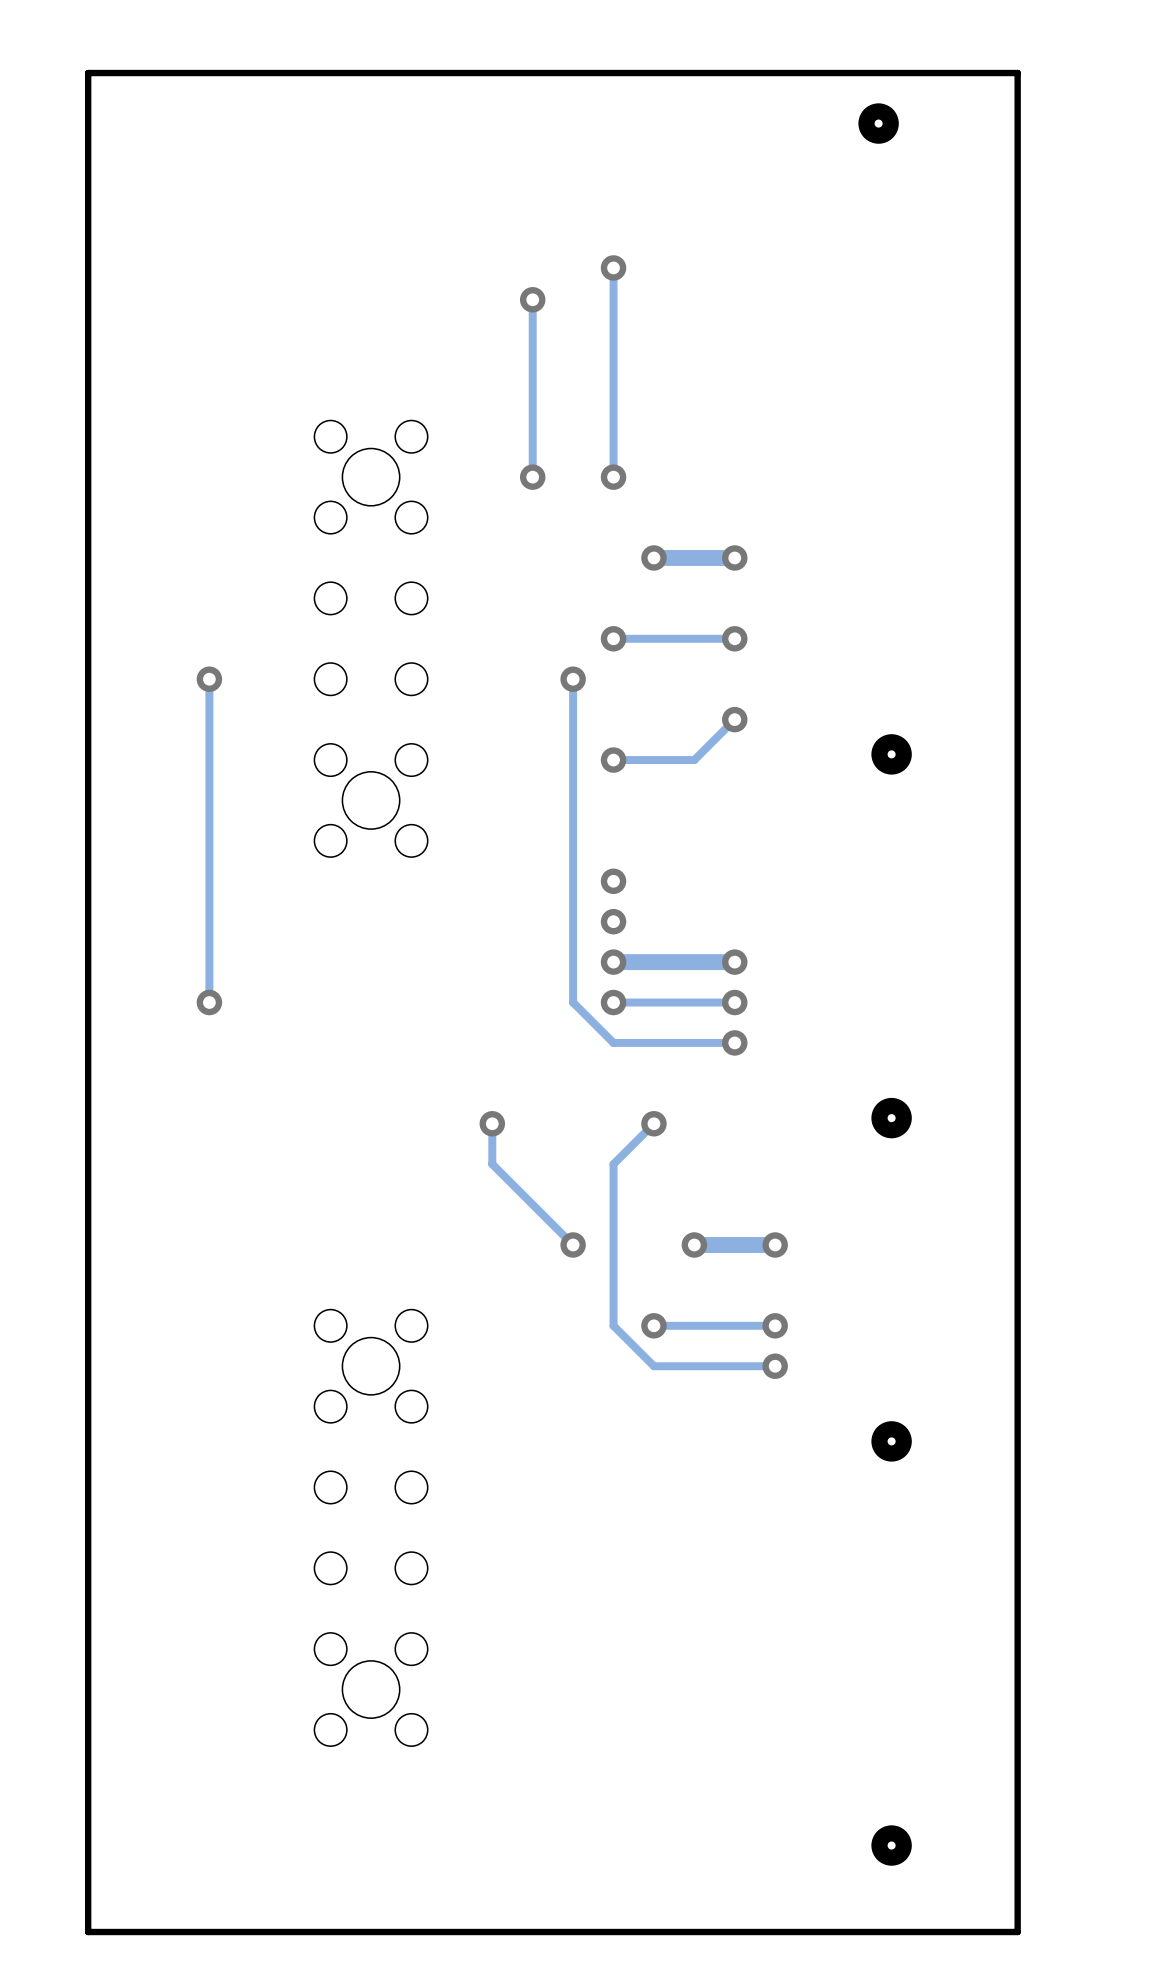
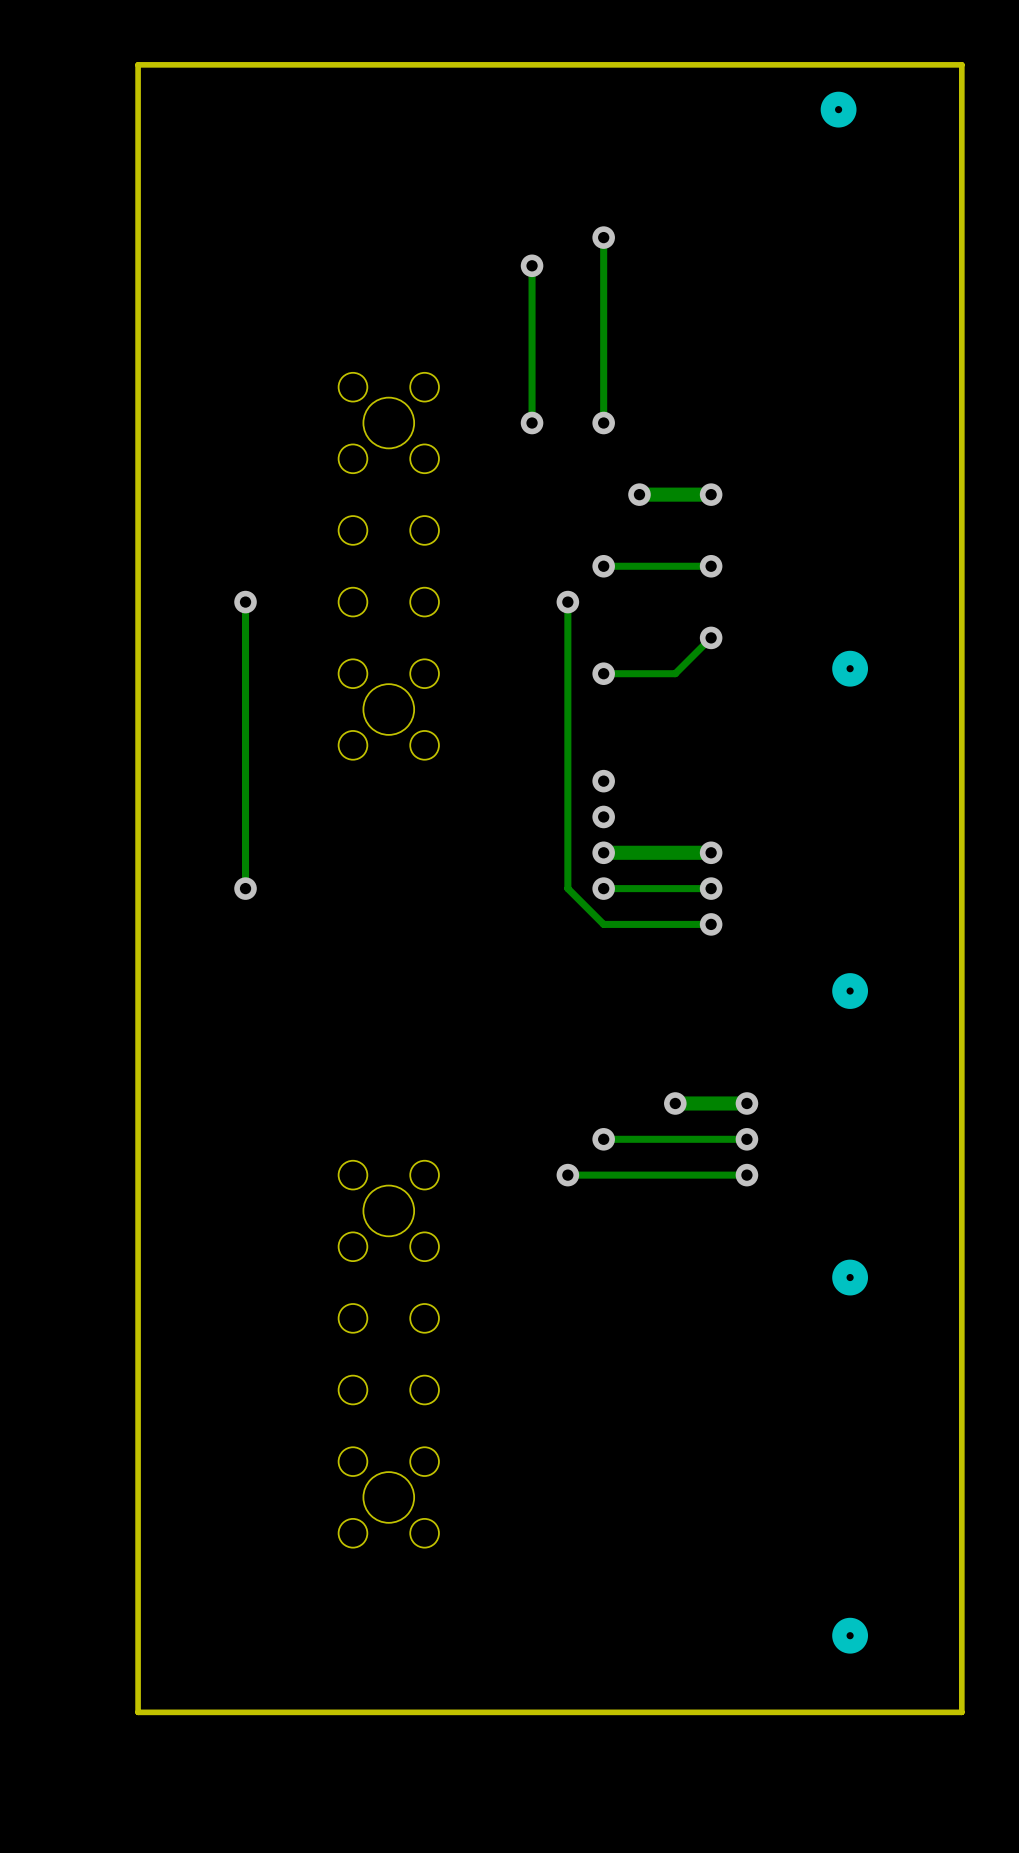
track: (492, 1123) (492, 1164) (573, 1244) -> none
via: (492, 1123) -> none
track: (653, 1123) (613, 1164) (613, 1325) (653, 1366) (775, 1366) -> none
via: (653, 1123) -> none
via: (573, 1244) -> none
via: none -> (603, 1139)
track: none -> (746, 1139) (603, 1139)
via: none -> (746, 1139)
via: none -> (567, 1175)
track: none -> (639, 1175) (567, 1175)
via: (653, 1325) -> none
via: (775, 1366) -> none

